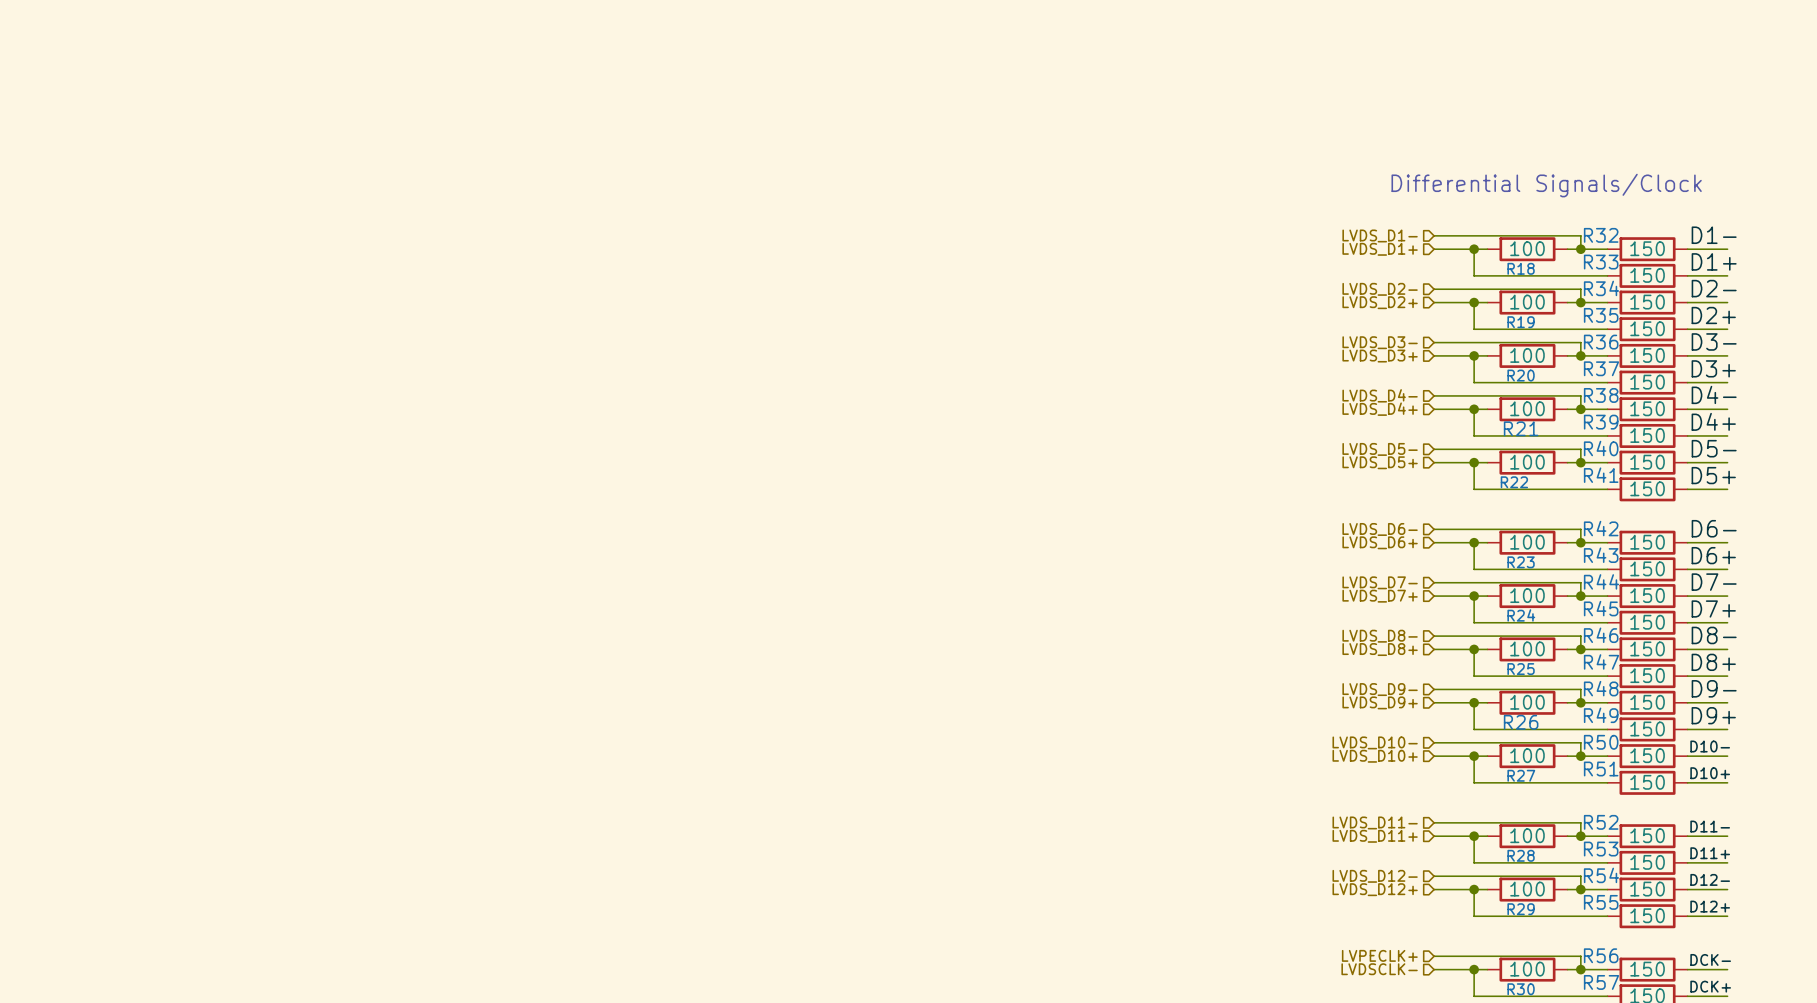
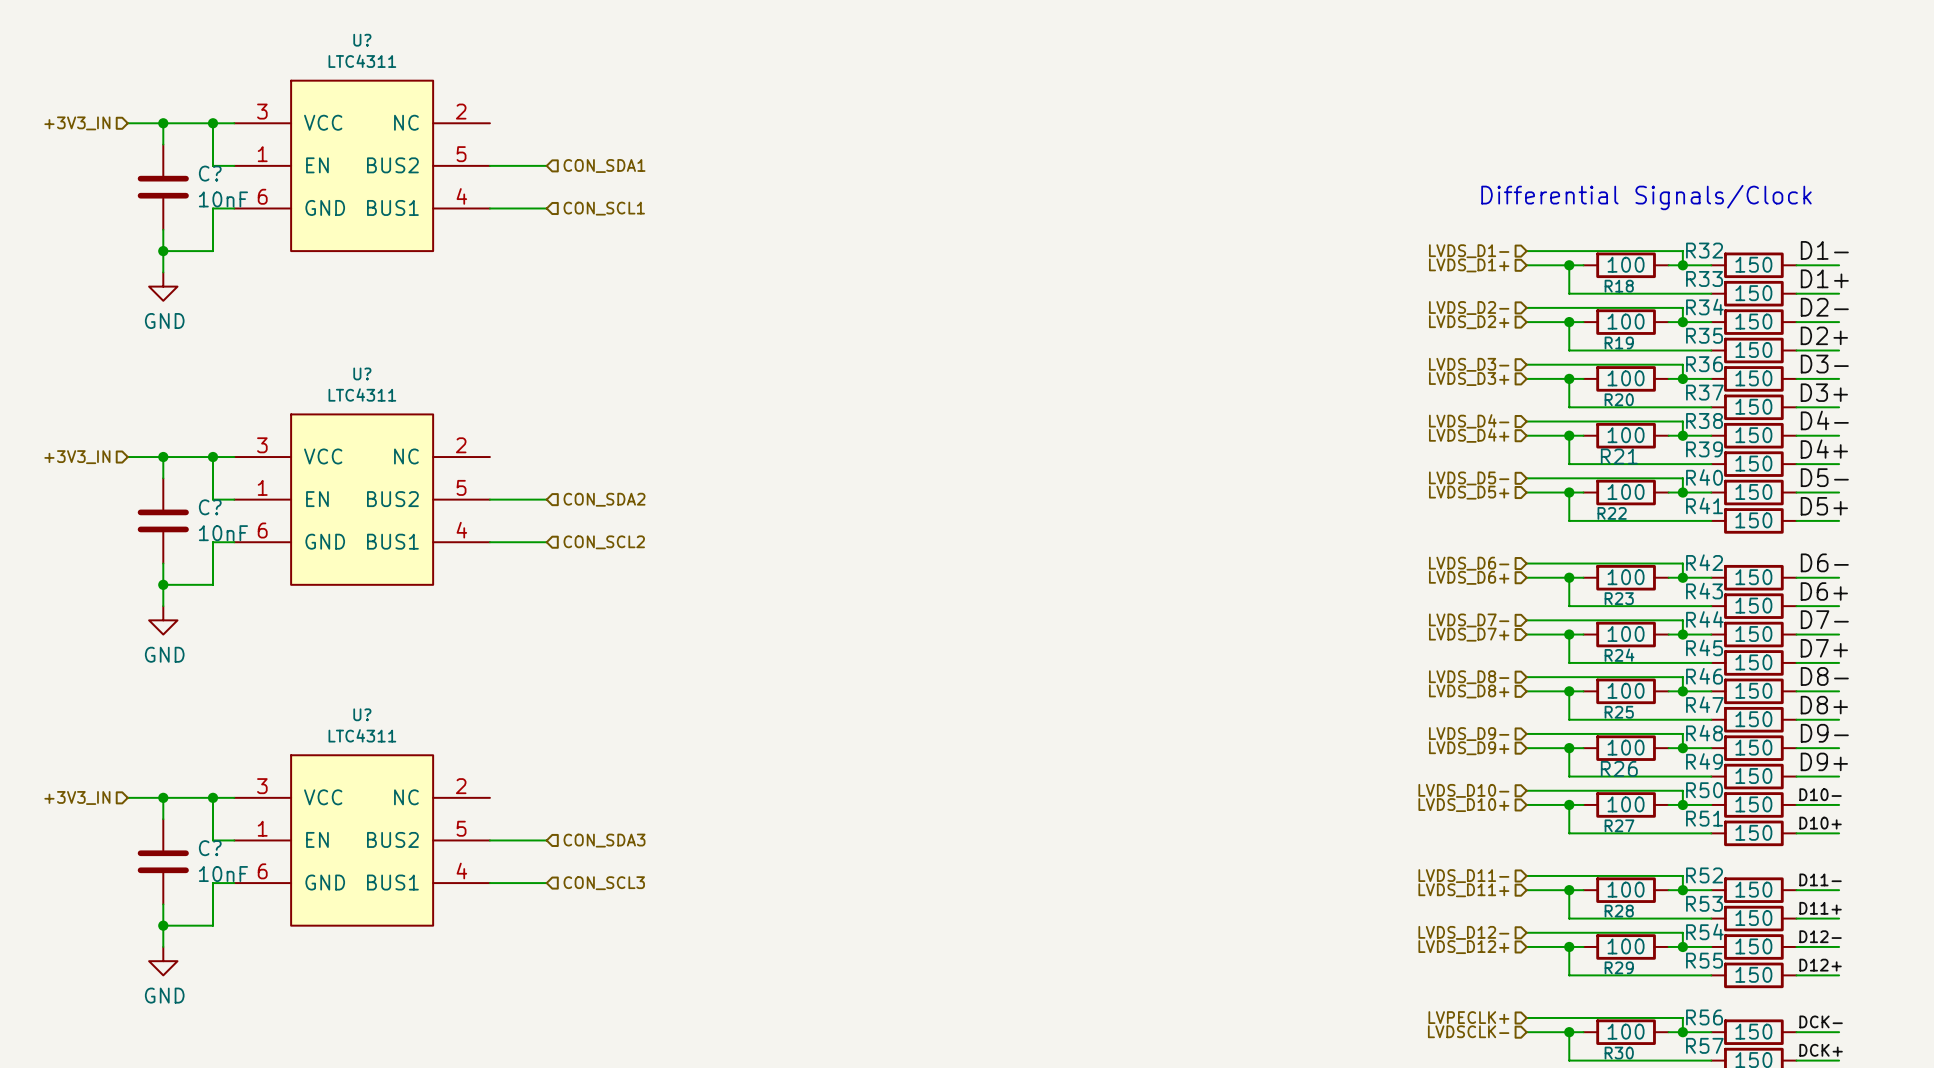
hierarchical label: none -> +3V3_IN (77, 123)
wire: none -> (127, 123) (234, 123)
wire: none -> (163, 123) (163, 144)
junction: none -> (163, 123)
wire: none -> (213, 123) (213, 165) (234, 165)
junction: none -> (213, 123)
U?: none -> LTC4311 (362, 165)
wire: none -> (489, 165) (546, 165)
hierarchical label: none -> CON_SDA1 (604, 165)
C?: none -> 10nF (163, 187)
wire: none -> (234, 208) (213, 208) (213, 251) (163, 251)
wire: none -> (489, 208) (546, 208)
hierarchical label: none -> CON_SCL1 (604, 208)
wire: none -> (163, 229) (163, 272)
junction: none -> (163, 251)
power symbol: none -> GND (163, 286)
hierarchical label: none -> +3V3_IN (77, 457)
wire: none -> (127, 457) (234, 457)
wire: none -> (163, 457) (163, 478)
junction: none -> (163, 457)
wire: none -> (213, 457) (213, 499) (234, 499)
junction: none -> (213, 457)
U?: none -> LTC4311 (362, 499)
wire: none -> (489, 499) (546, 499)
hierarchical label: none -> CON_SDA2 (604, 499)
C?: none -> 10nF (163, 520)
wire: none -> (234, 542) (213, 542) (213, 584) (163, 584)
wire: none -> (489, 542) (546, 542)
hierarchical label: none -> CON_SCL2 (604, 542)
wire: none -> (163, 563) (163, 606)
junction: none -> (163, 584)
power symbol: none -> GND (163, 620)
hierarchical label: none -> +3V3_IN (77, 797)
wire: none -> (127, 797) (234, 797)
wire: none -> (163, 797) (163, 819)
junction: none -> (163, 797)
wire: none -> (213, 797) (213, 840) (234, 840)
junction: none -> (213, 797)
U?: none -> LTC4311 (362, 840)
wire: none -> (489, 840) (546, 840)
hierarchical label: none -> CON_SDA3 (604, 840)
C?: none -> 10nF (163, 861)
wire: none -> (234, 883) (213, 883) (213, 925) (163, 925)
wire: none -> (489, 883) (546, 883)
hierarchical label: none -> CON_SCL3 (604, 883)
wire: none -> (163, 904) (163, 946)
junction: none -> (163, 925)
power symbol: none -> GND (163, 961)

